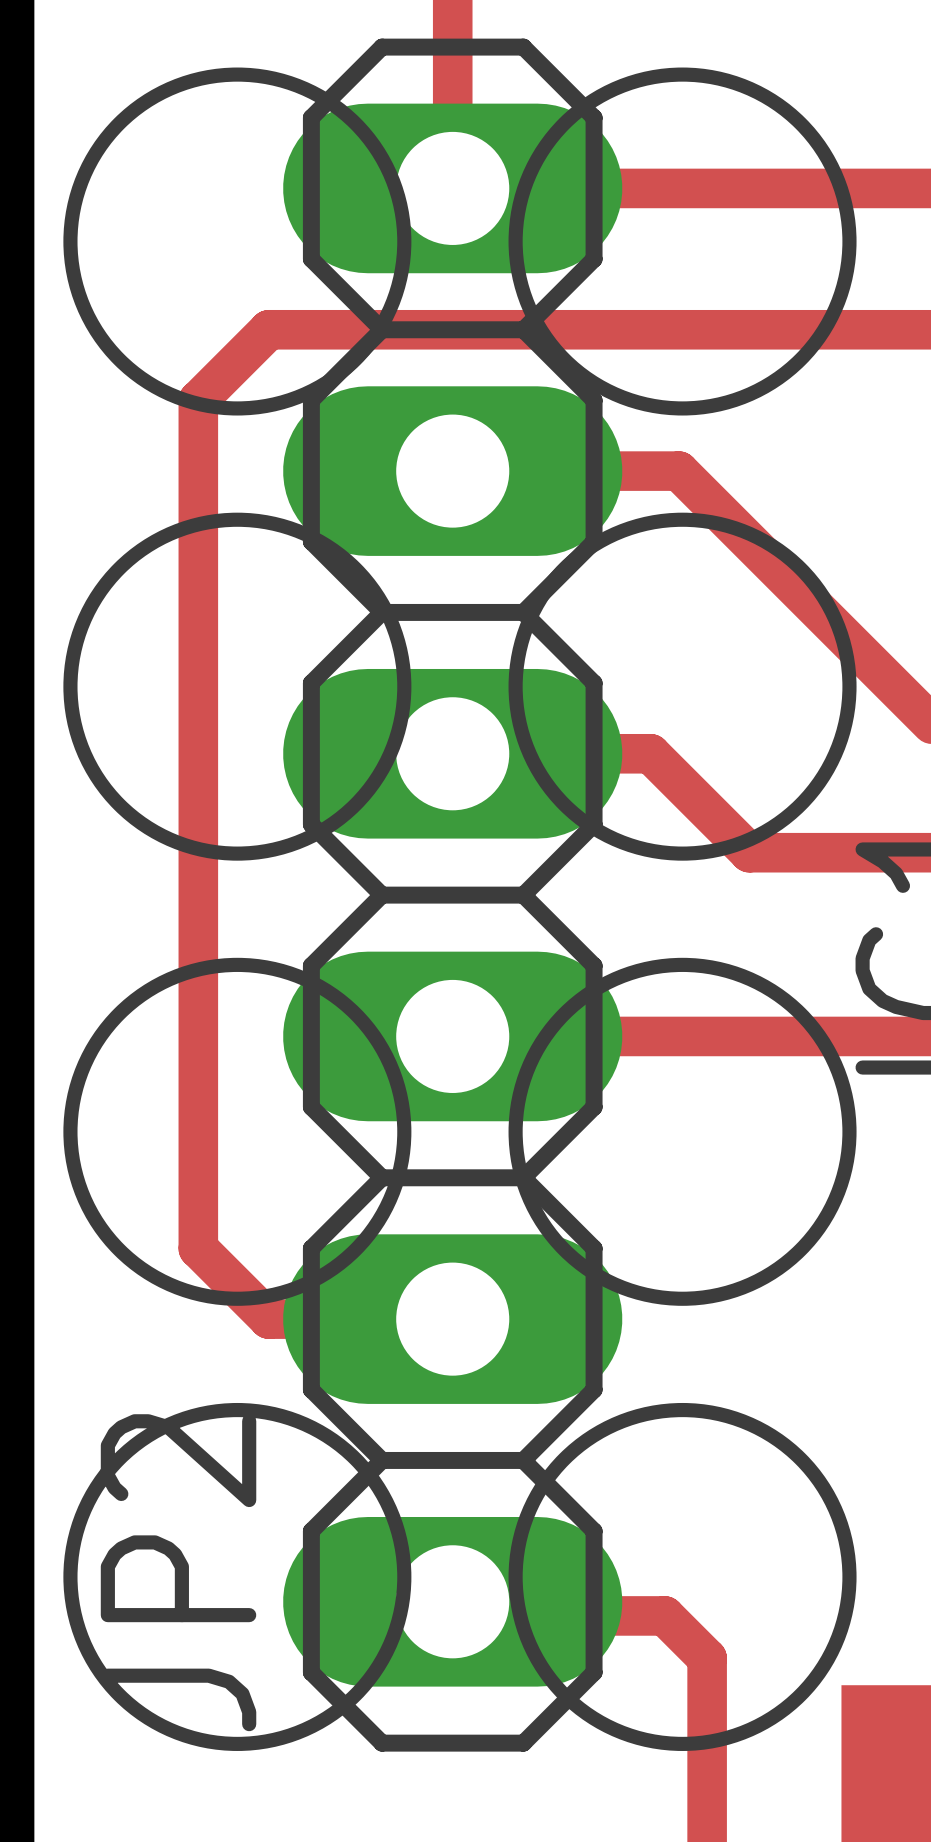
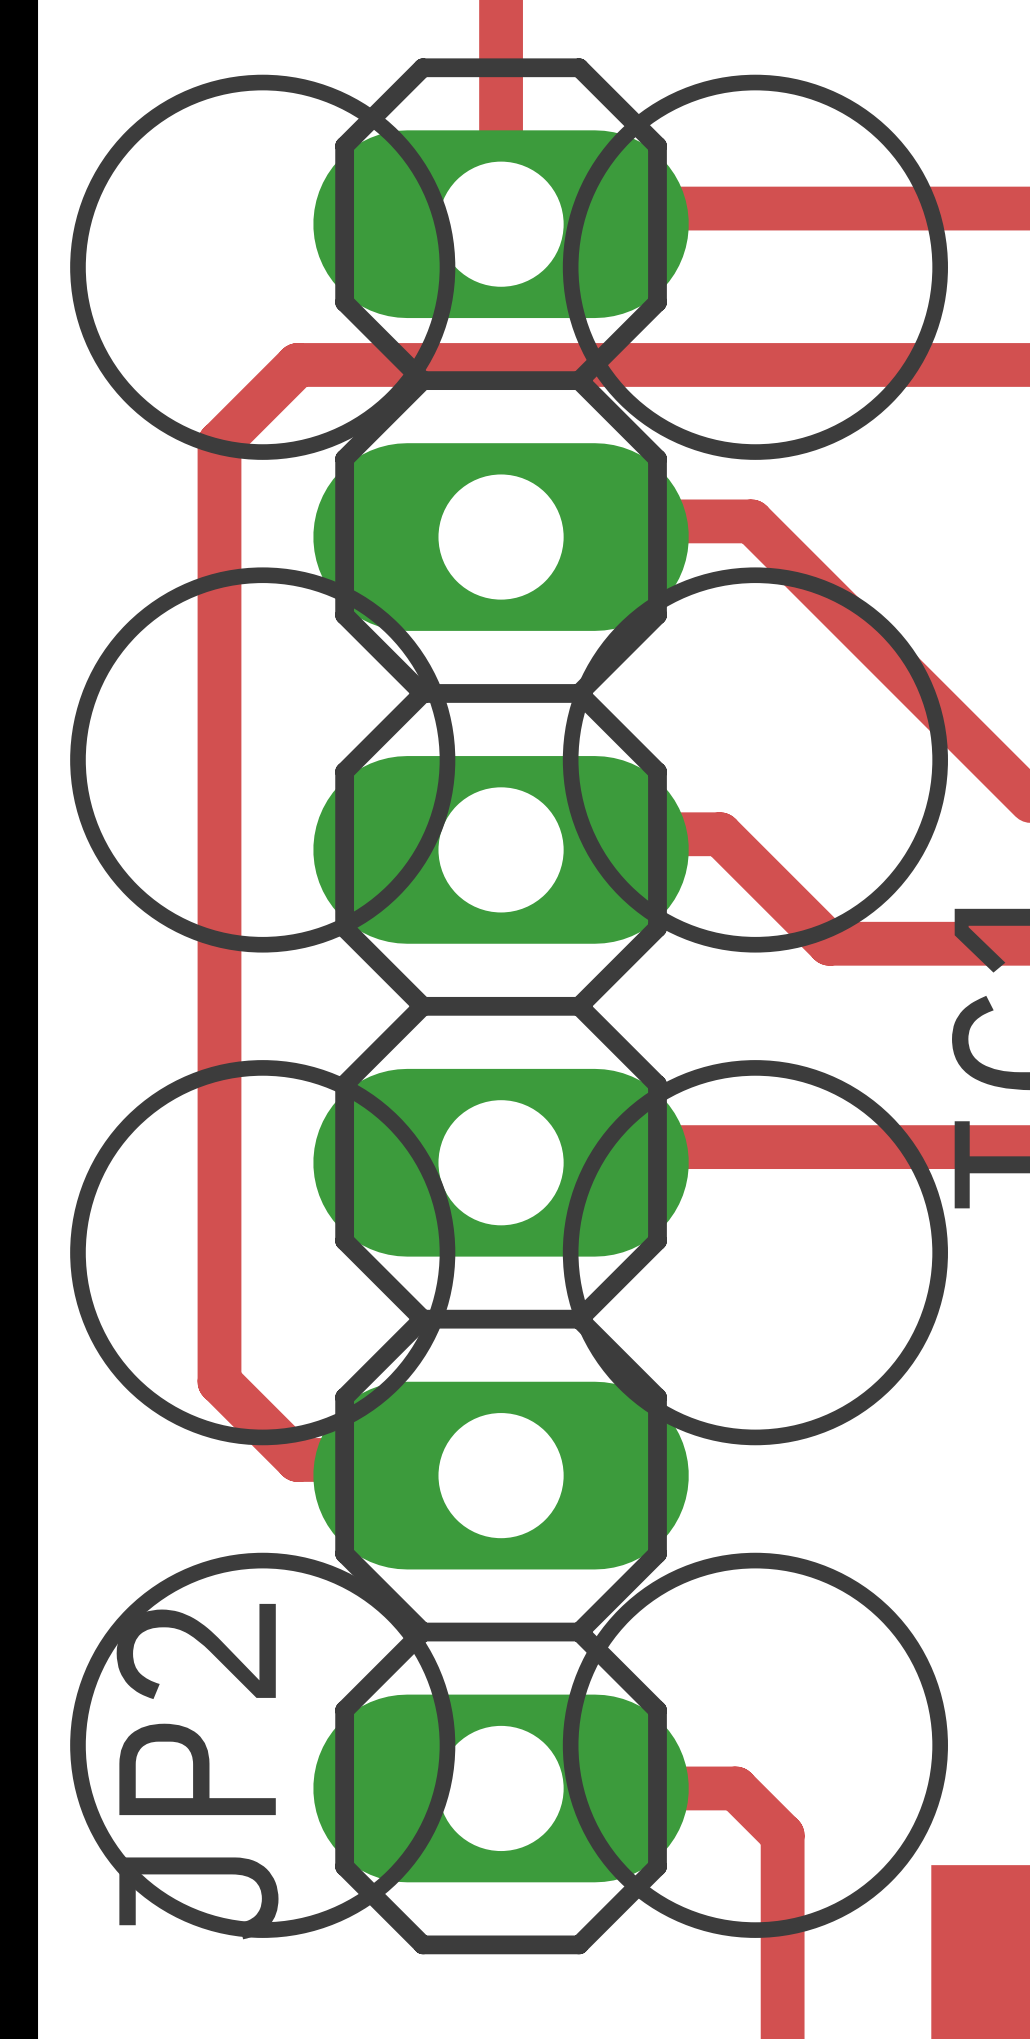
JP2 position: (452, 895) -> (501, 1006)

